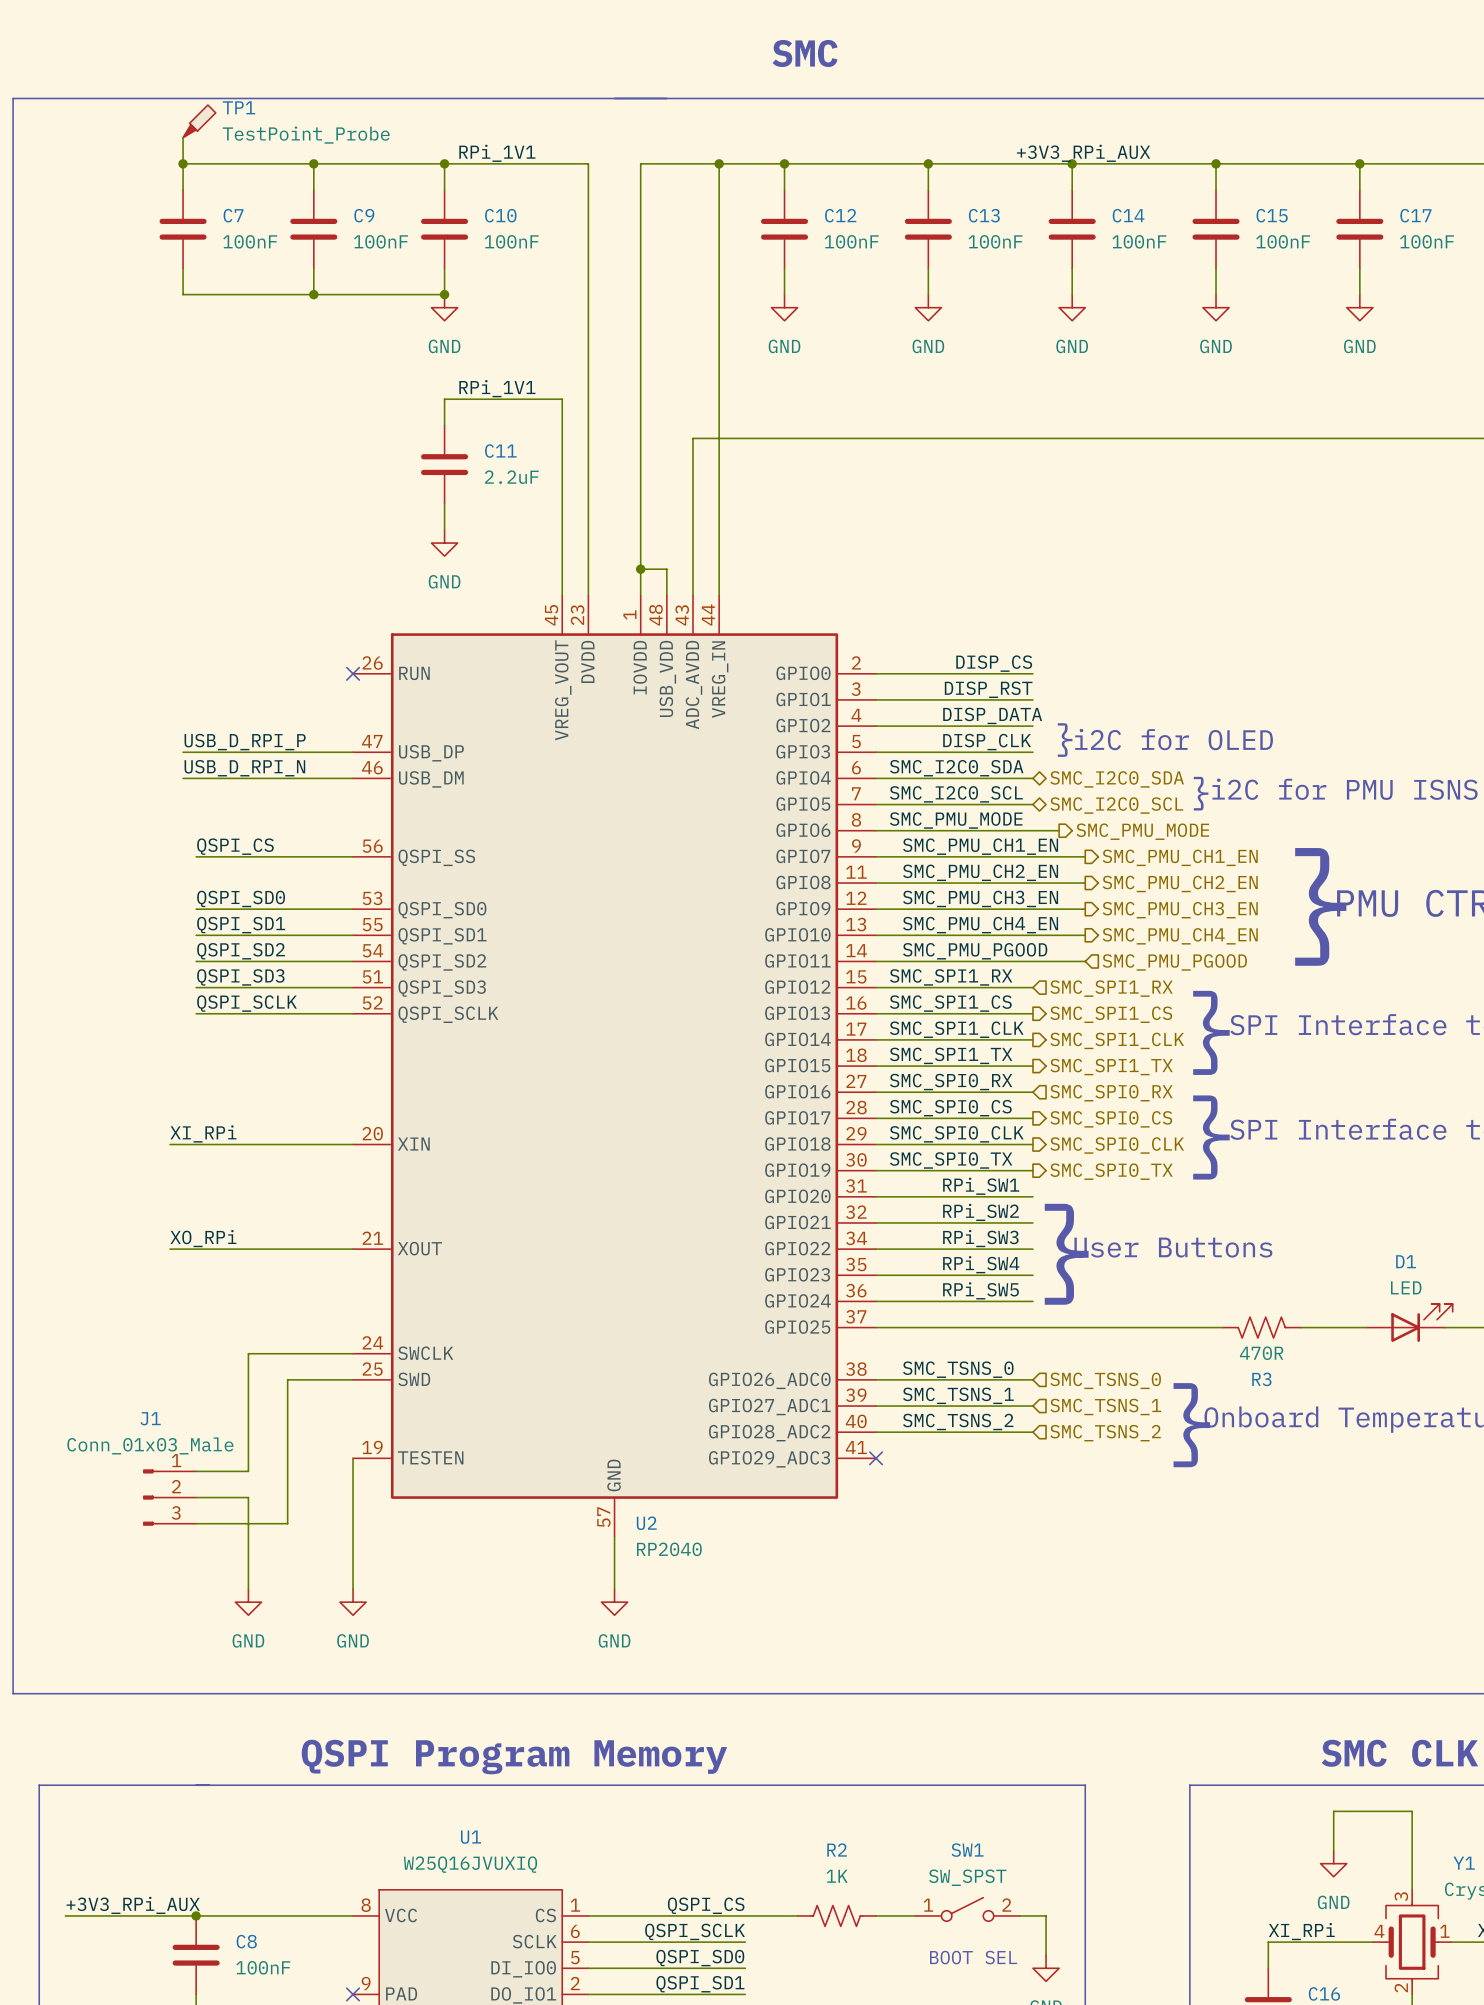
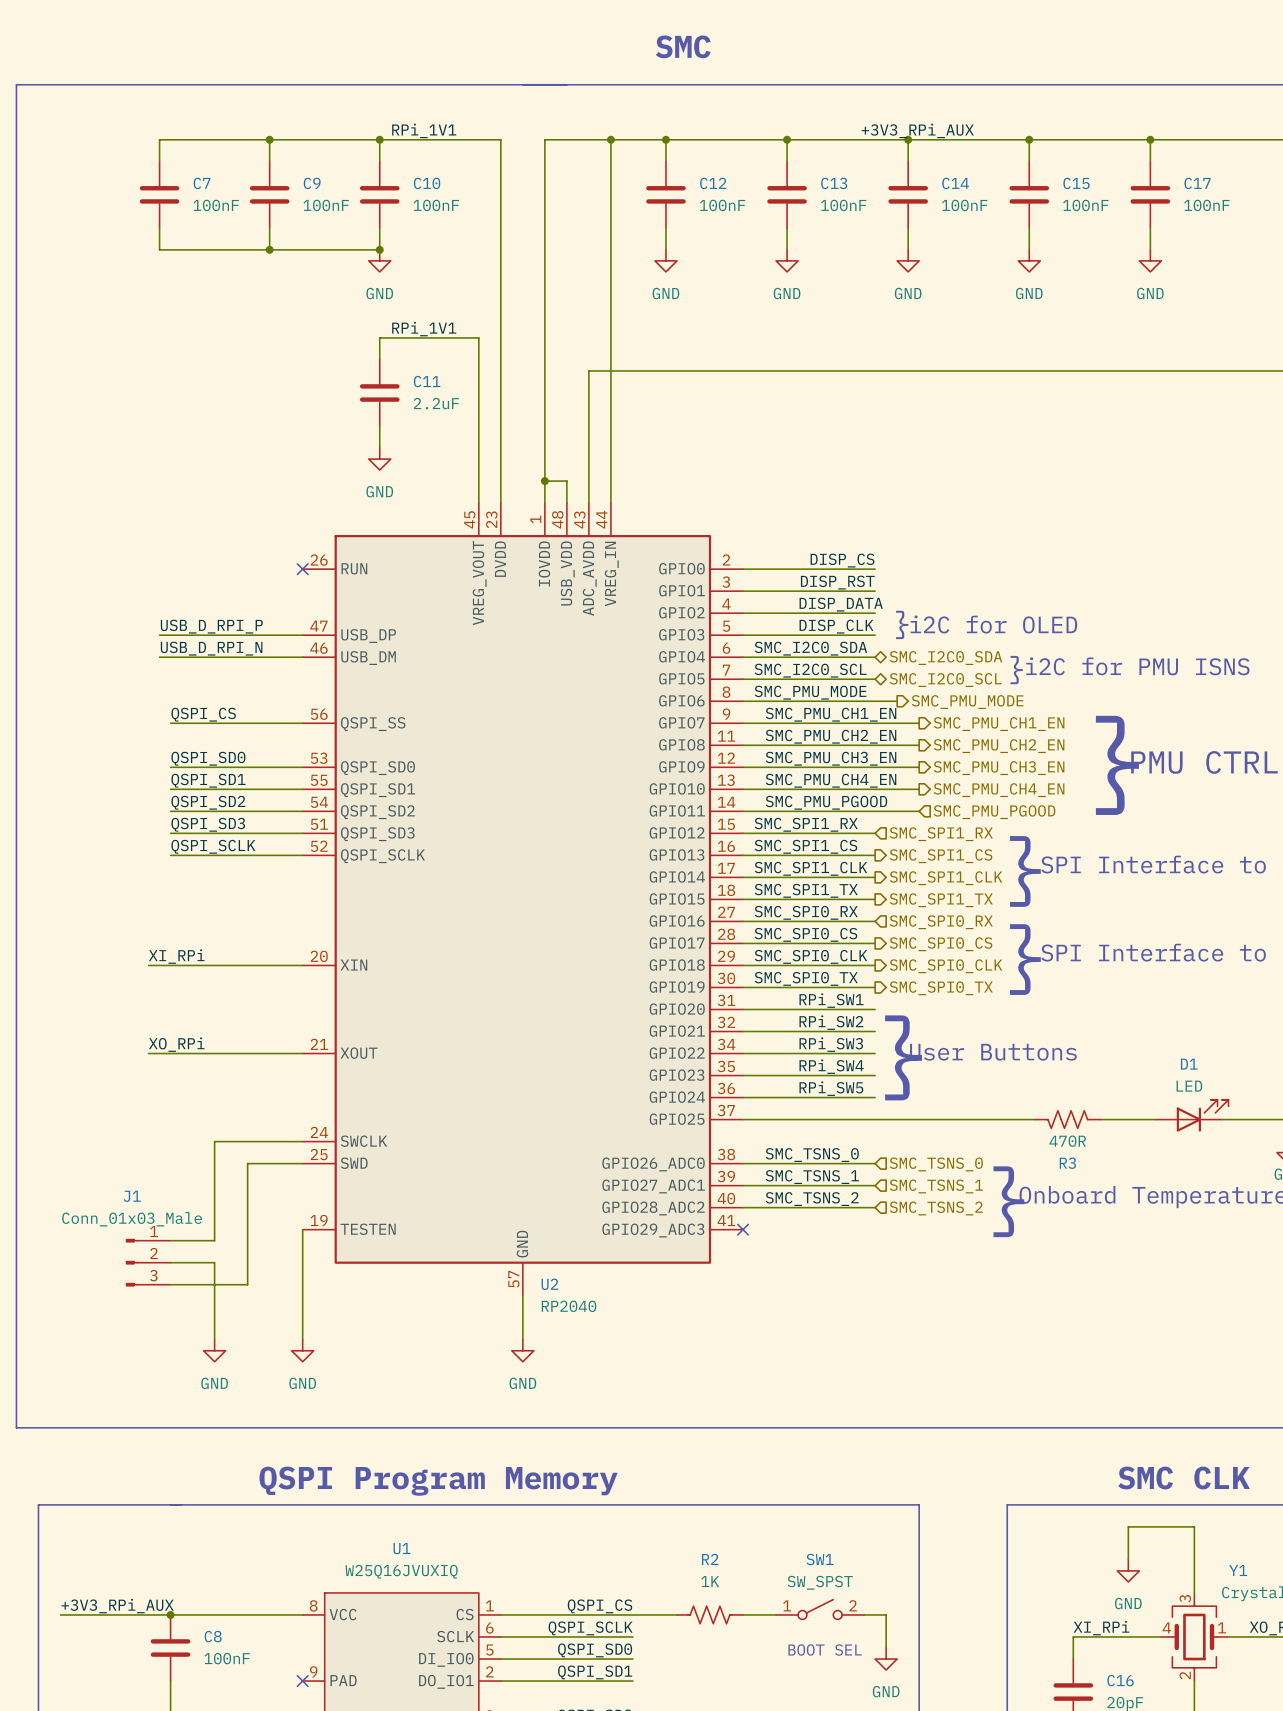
TP1: TestPoint_Probe (199, 121) -> none
wire: (183, 137) (183, 163) -> none
junction: (183, 163) -> none

